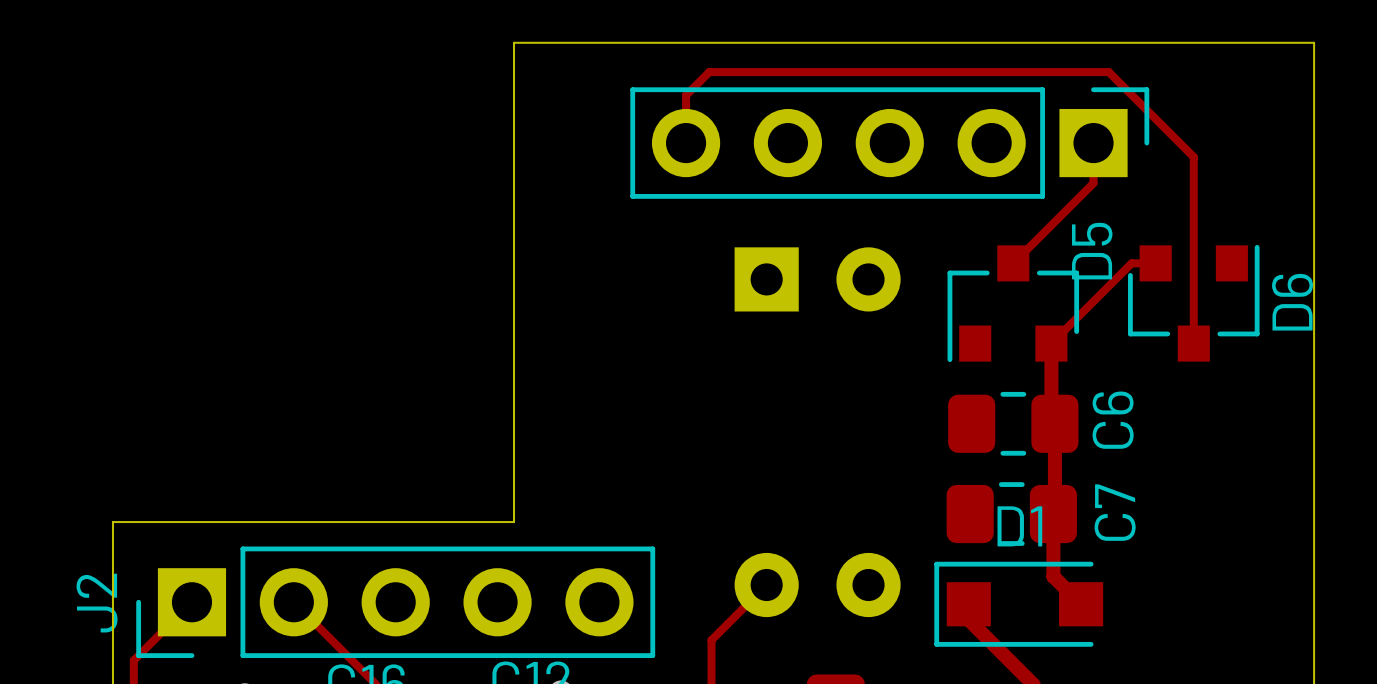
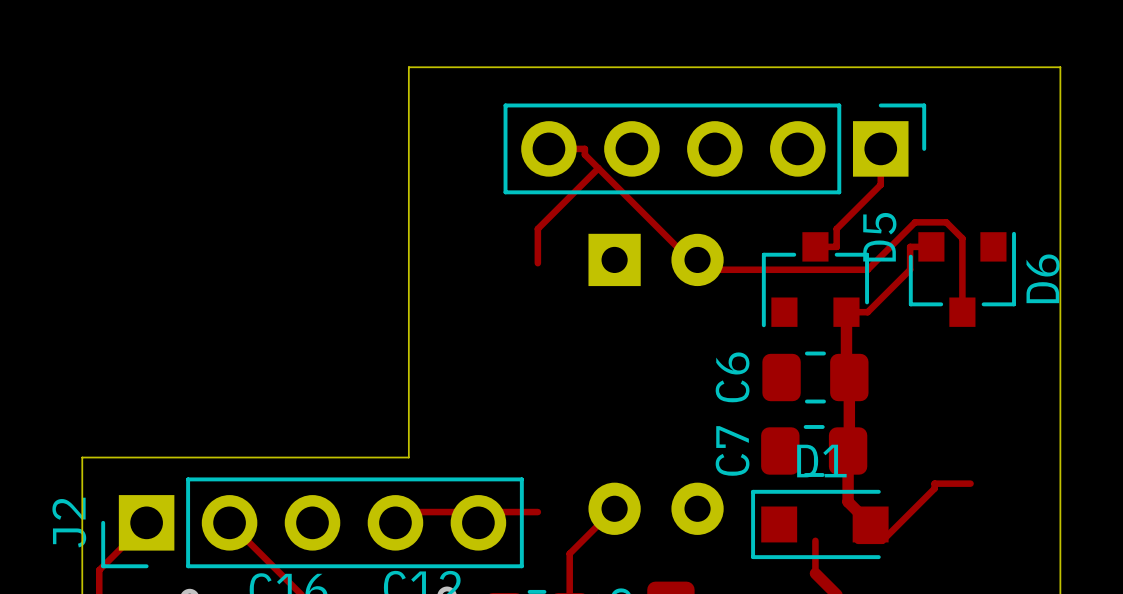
track: (686, 143) (686, 95) (709, 72) (1108, 72) (1193, 157) (1193, 253) -> (598, 168) (699, 269) (867, 269) (915, 222) (946, 222) (962, 238)
track: none -> (548, 148) (584, 148) (584, 154) (598, 168)
track: none -> (598, 168) (537, 228) (537, 263)
track: (1093, 183) (1013, 263) -> (880, 181) (880, 184) (836, 228) (836, 246) (815, 246)
track: (1131, 263) (1051, 343) -> (911, 246) (910, 246) (910, 269) (867, 312) (846, 312)
C6 name position: C6 (1113, 420) -> C6 (732, 377)
C7 name position: C7 (1115, 512) -> C7 (732, 450)
track: none -> (970, 483) (934, 483) (934, 488) (882, 540) (857, 540)
track: none -> (537, 512) (418, 512) (396, 534)
track: (968, 604) (968, 619) (1013, 664) -> (815, 540) (815, 573)

